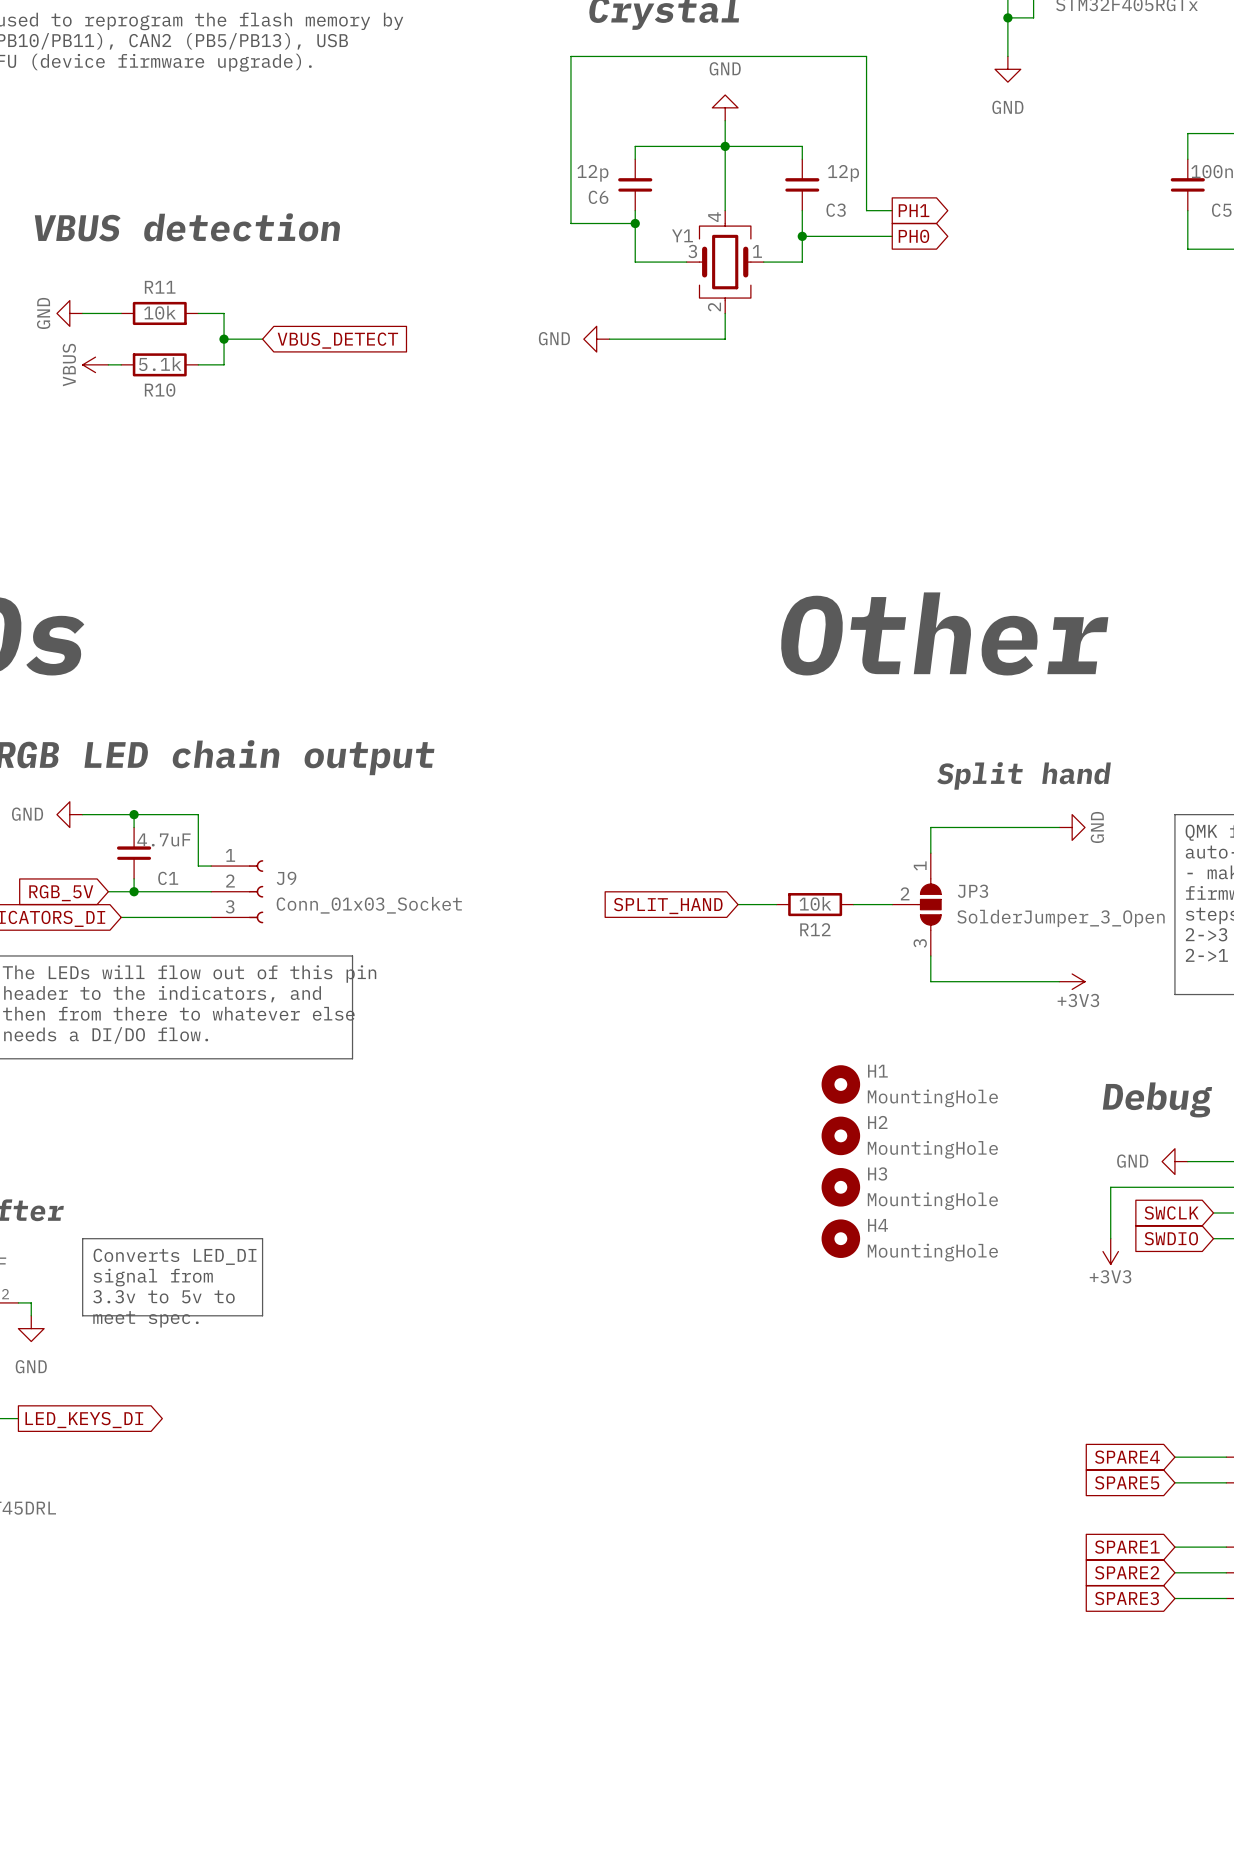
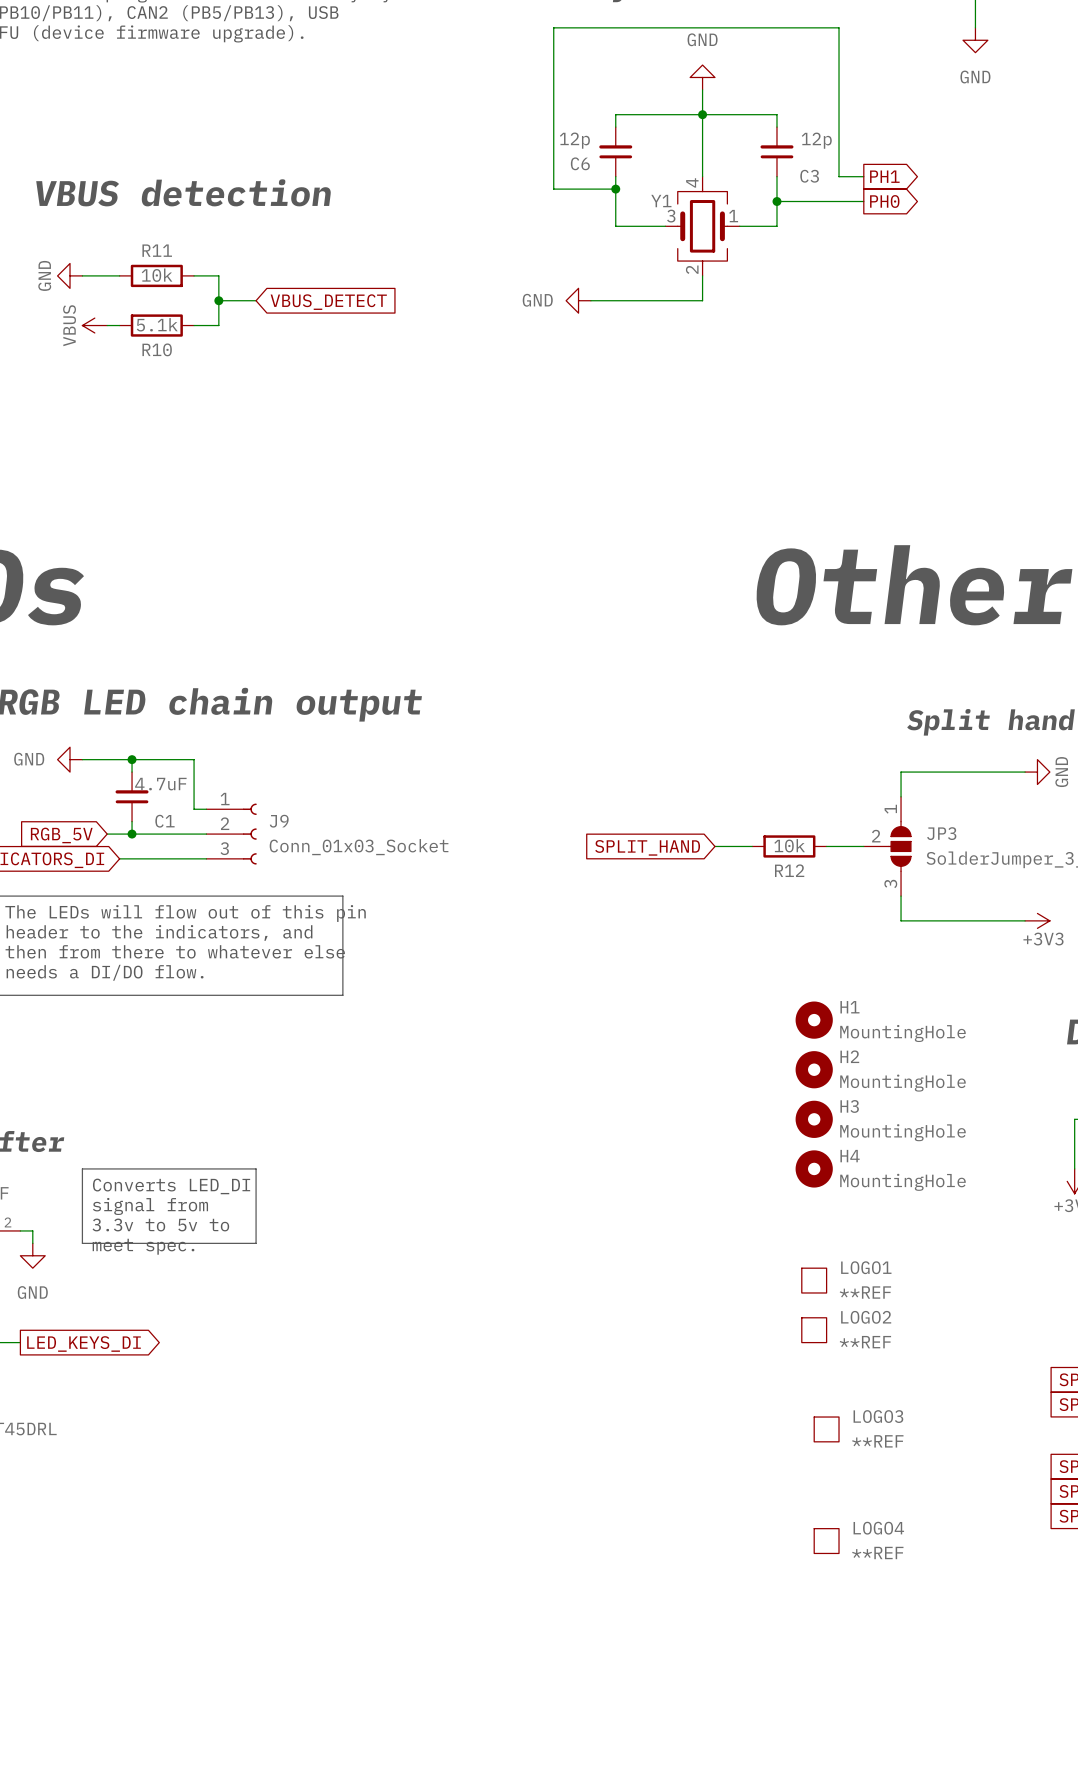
LOGO1: none -> **REF (814, 1280)
LOGO2: none -> **REF (814, 1330)
LOGO3: none -> **REF (826, 1429)
LOGO4: none -> **REF (826, 1541)

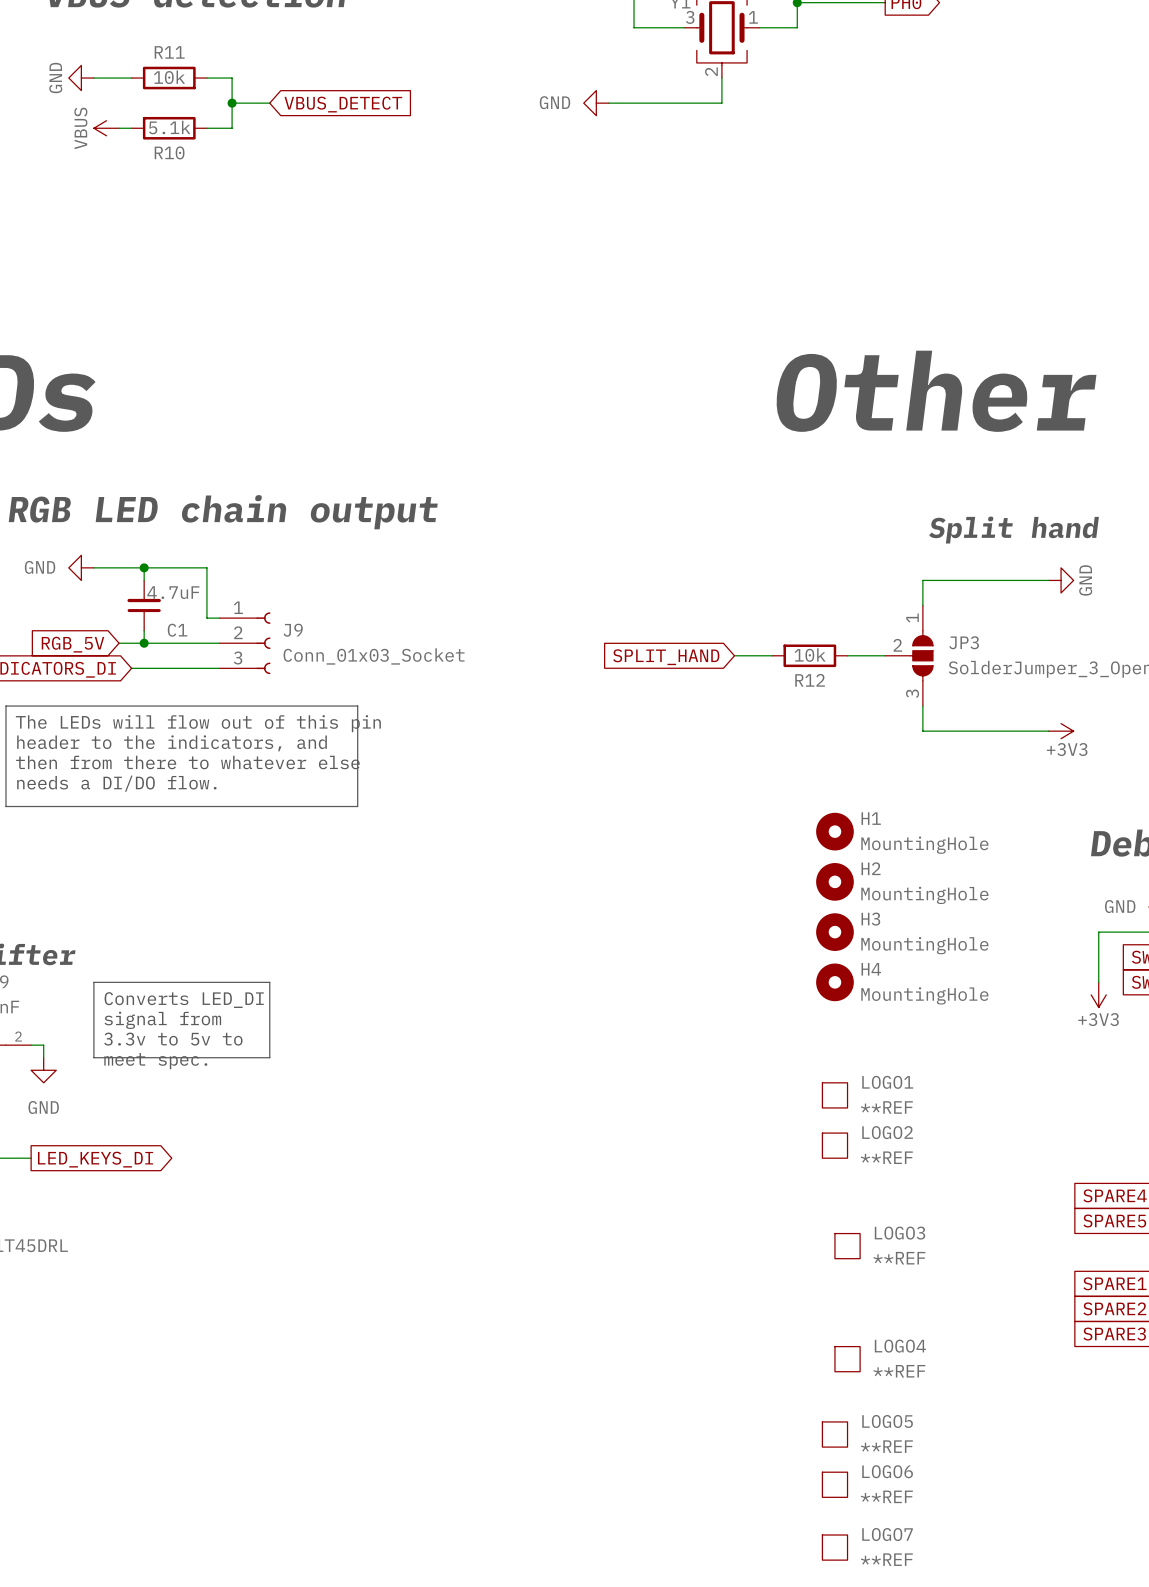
LOGO5: none -> **REF (834, 1434)
LOGO6: none -> **REF (834, 1484)
LOGO7: none -> **REF (834, 1547)

